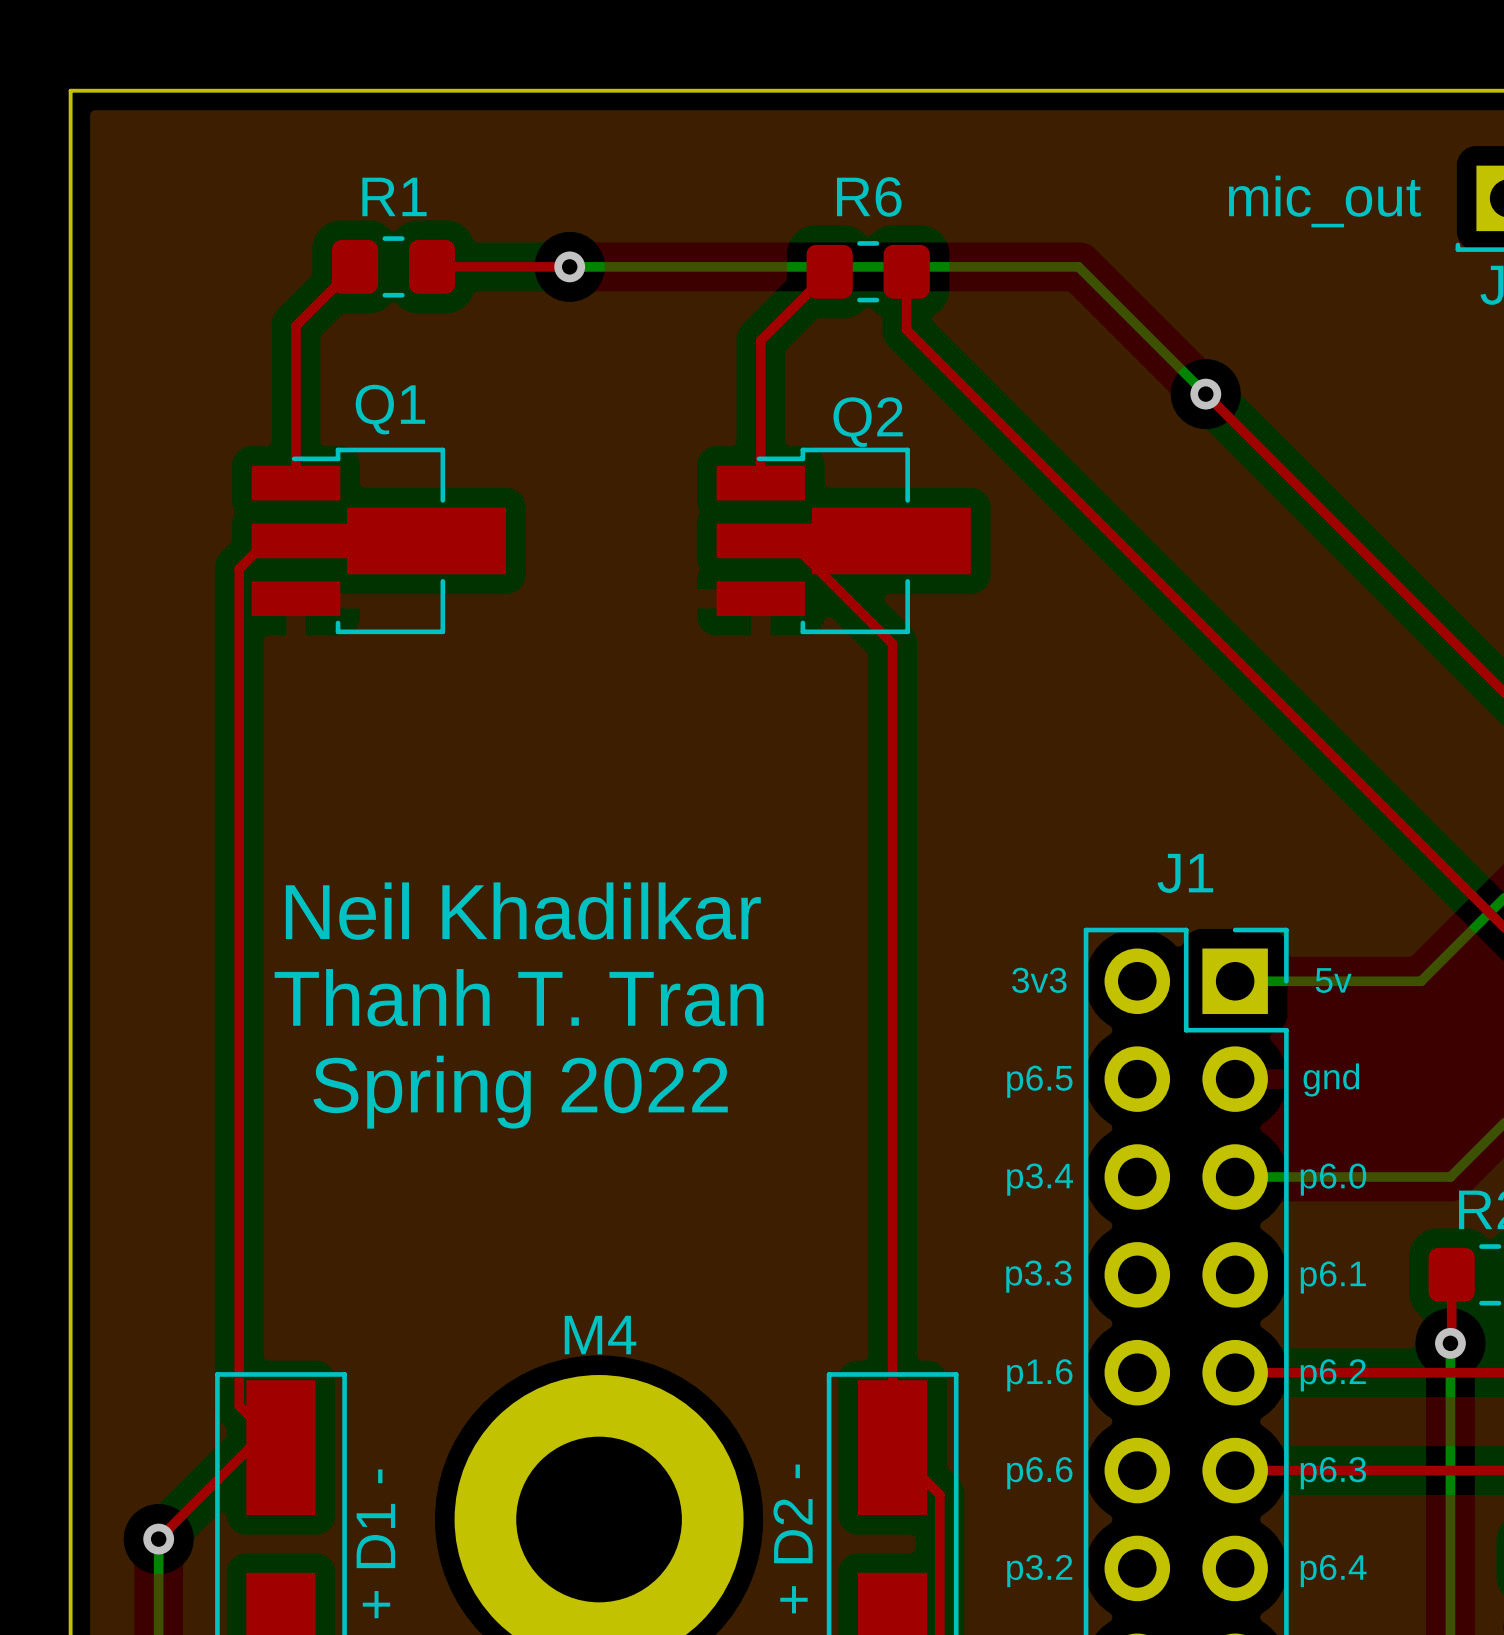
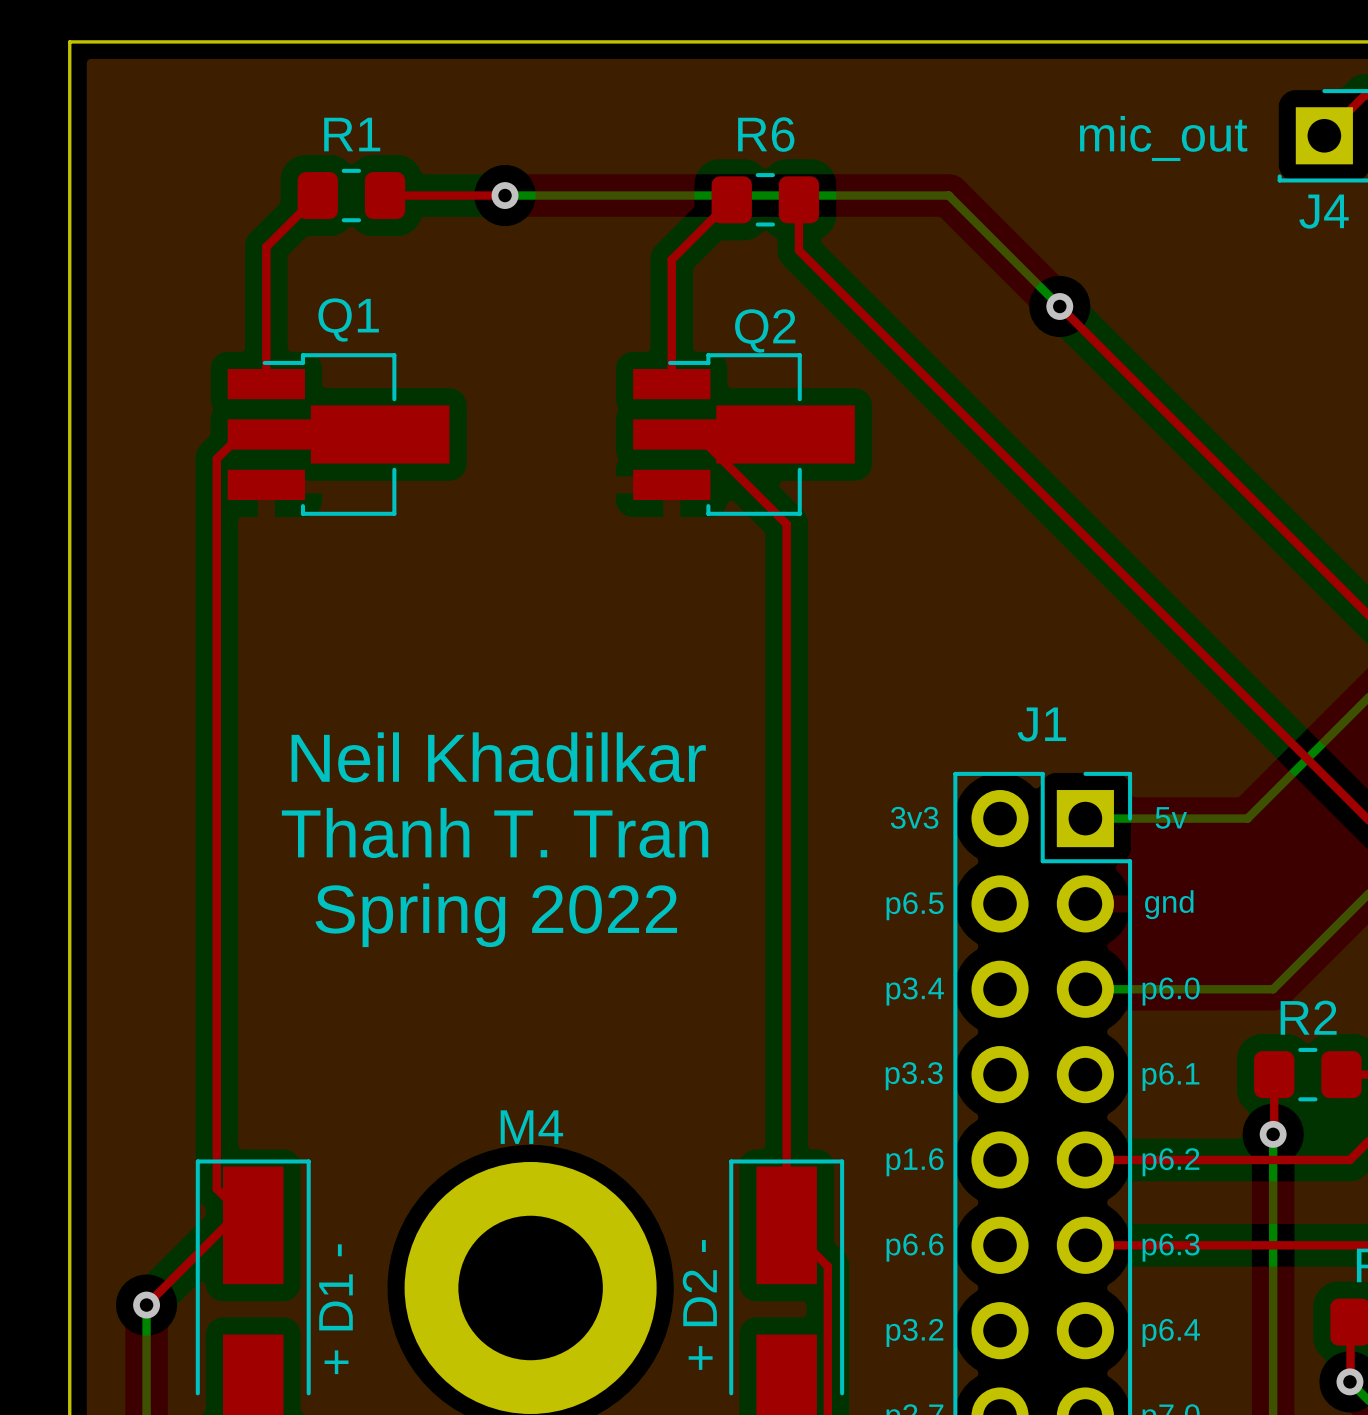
text position: Neil Khadilkar (523, 911) -> Neil Khadilkar (498, 757)
text position: Thanh T. Tran (519, 997) -> Thanh T. Tran (495, 832)
text position: Spring 2022 (520, 1092) -> Spring 2022 (496, 915)

